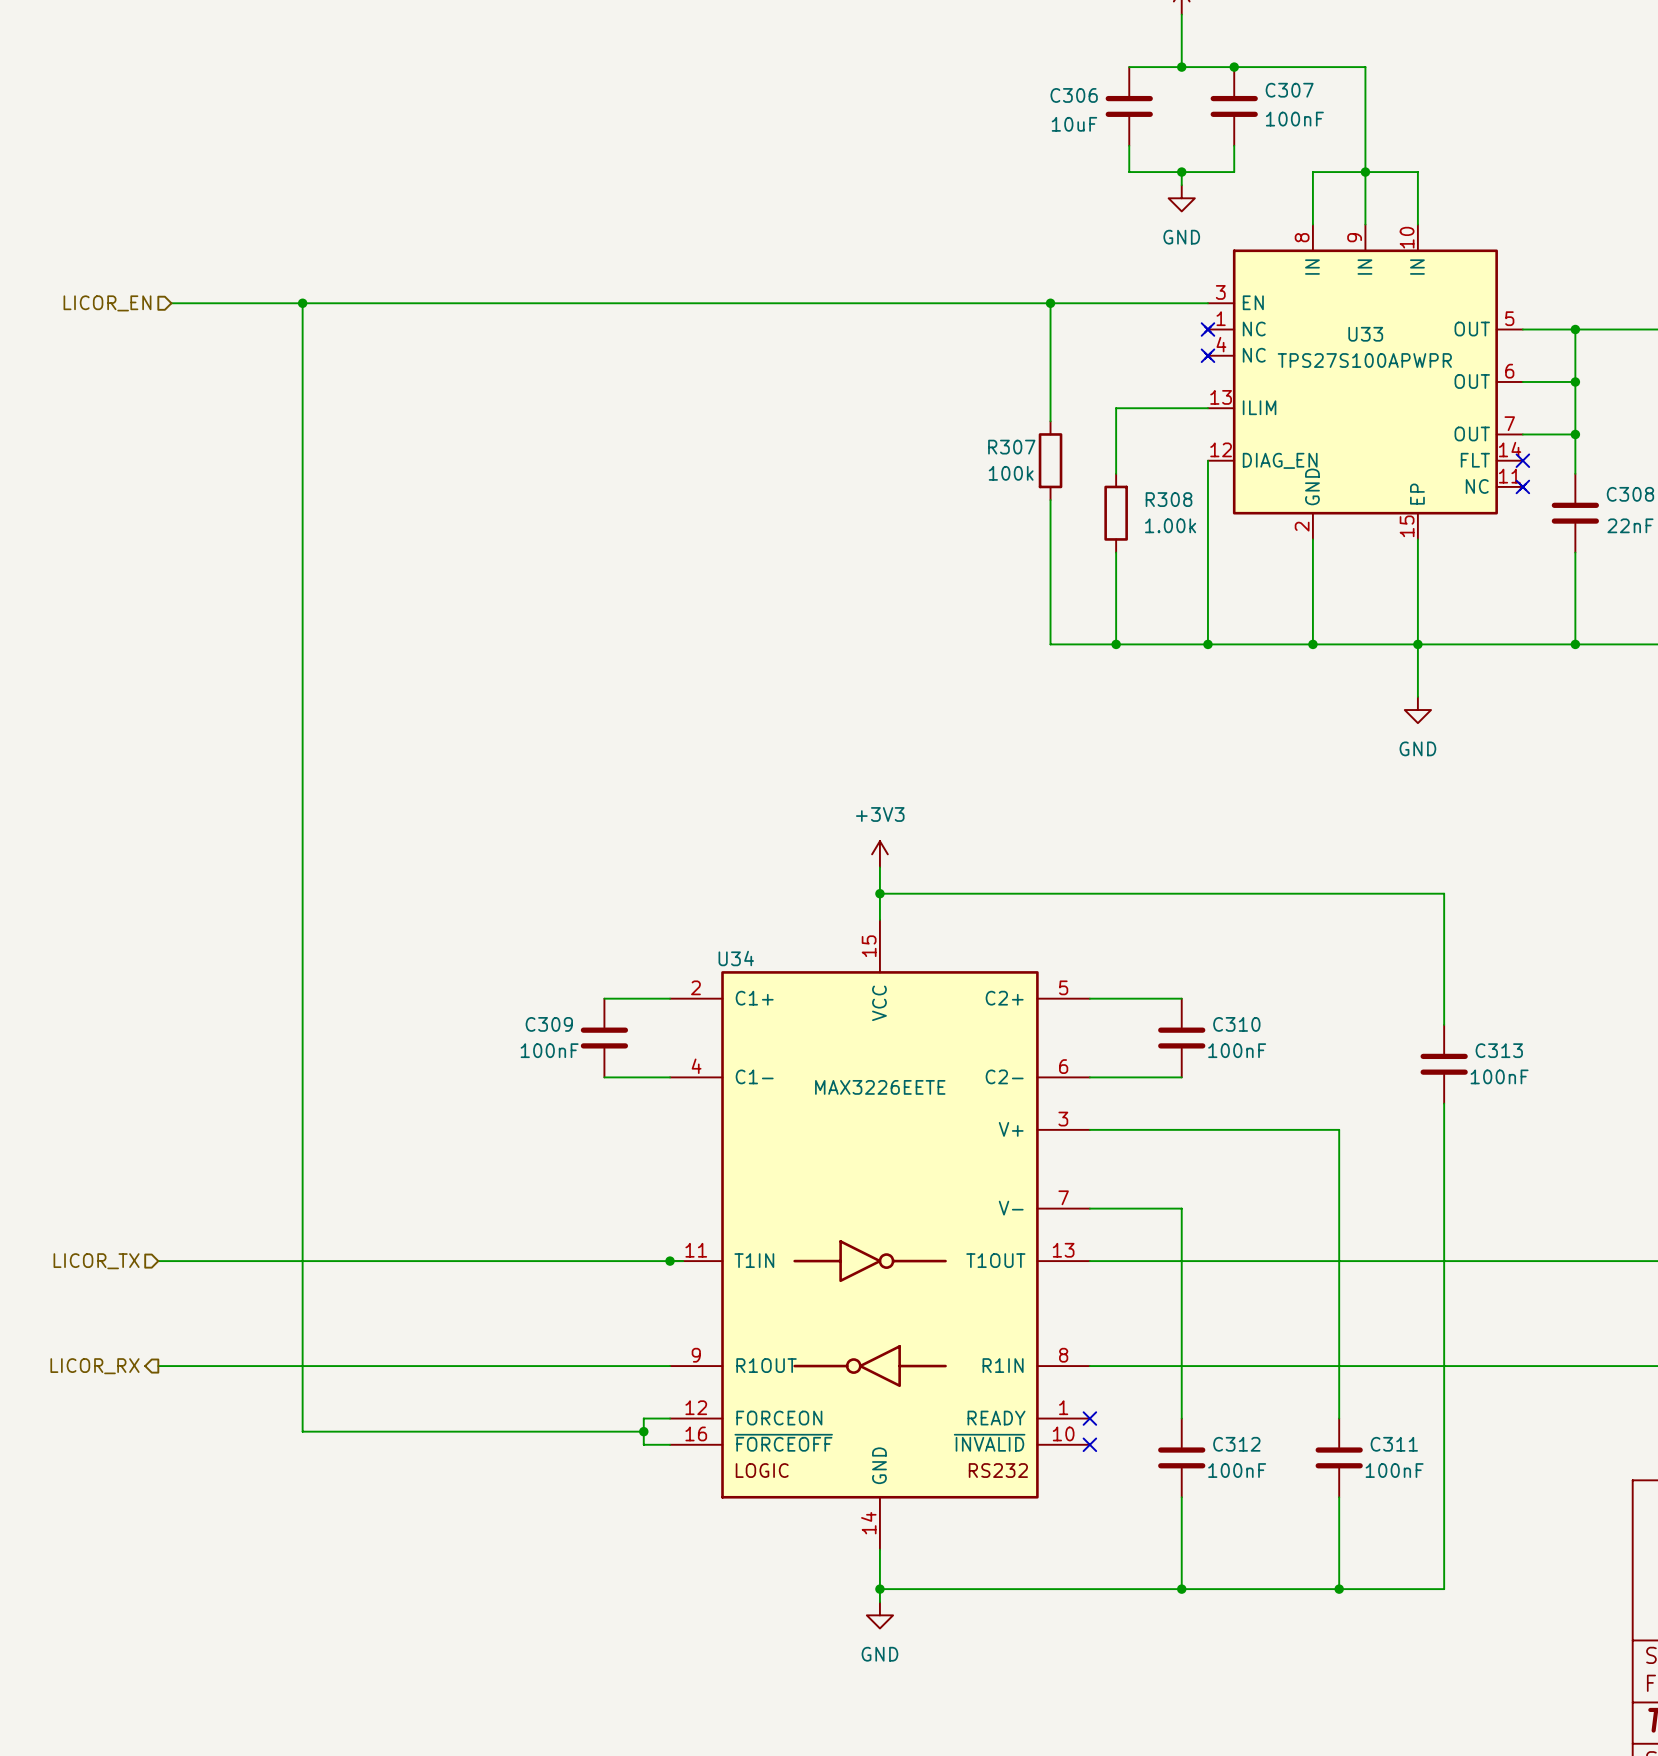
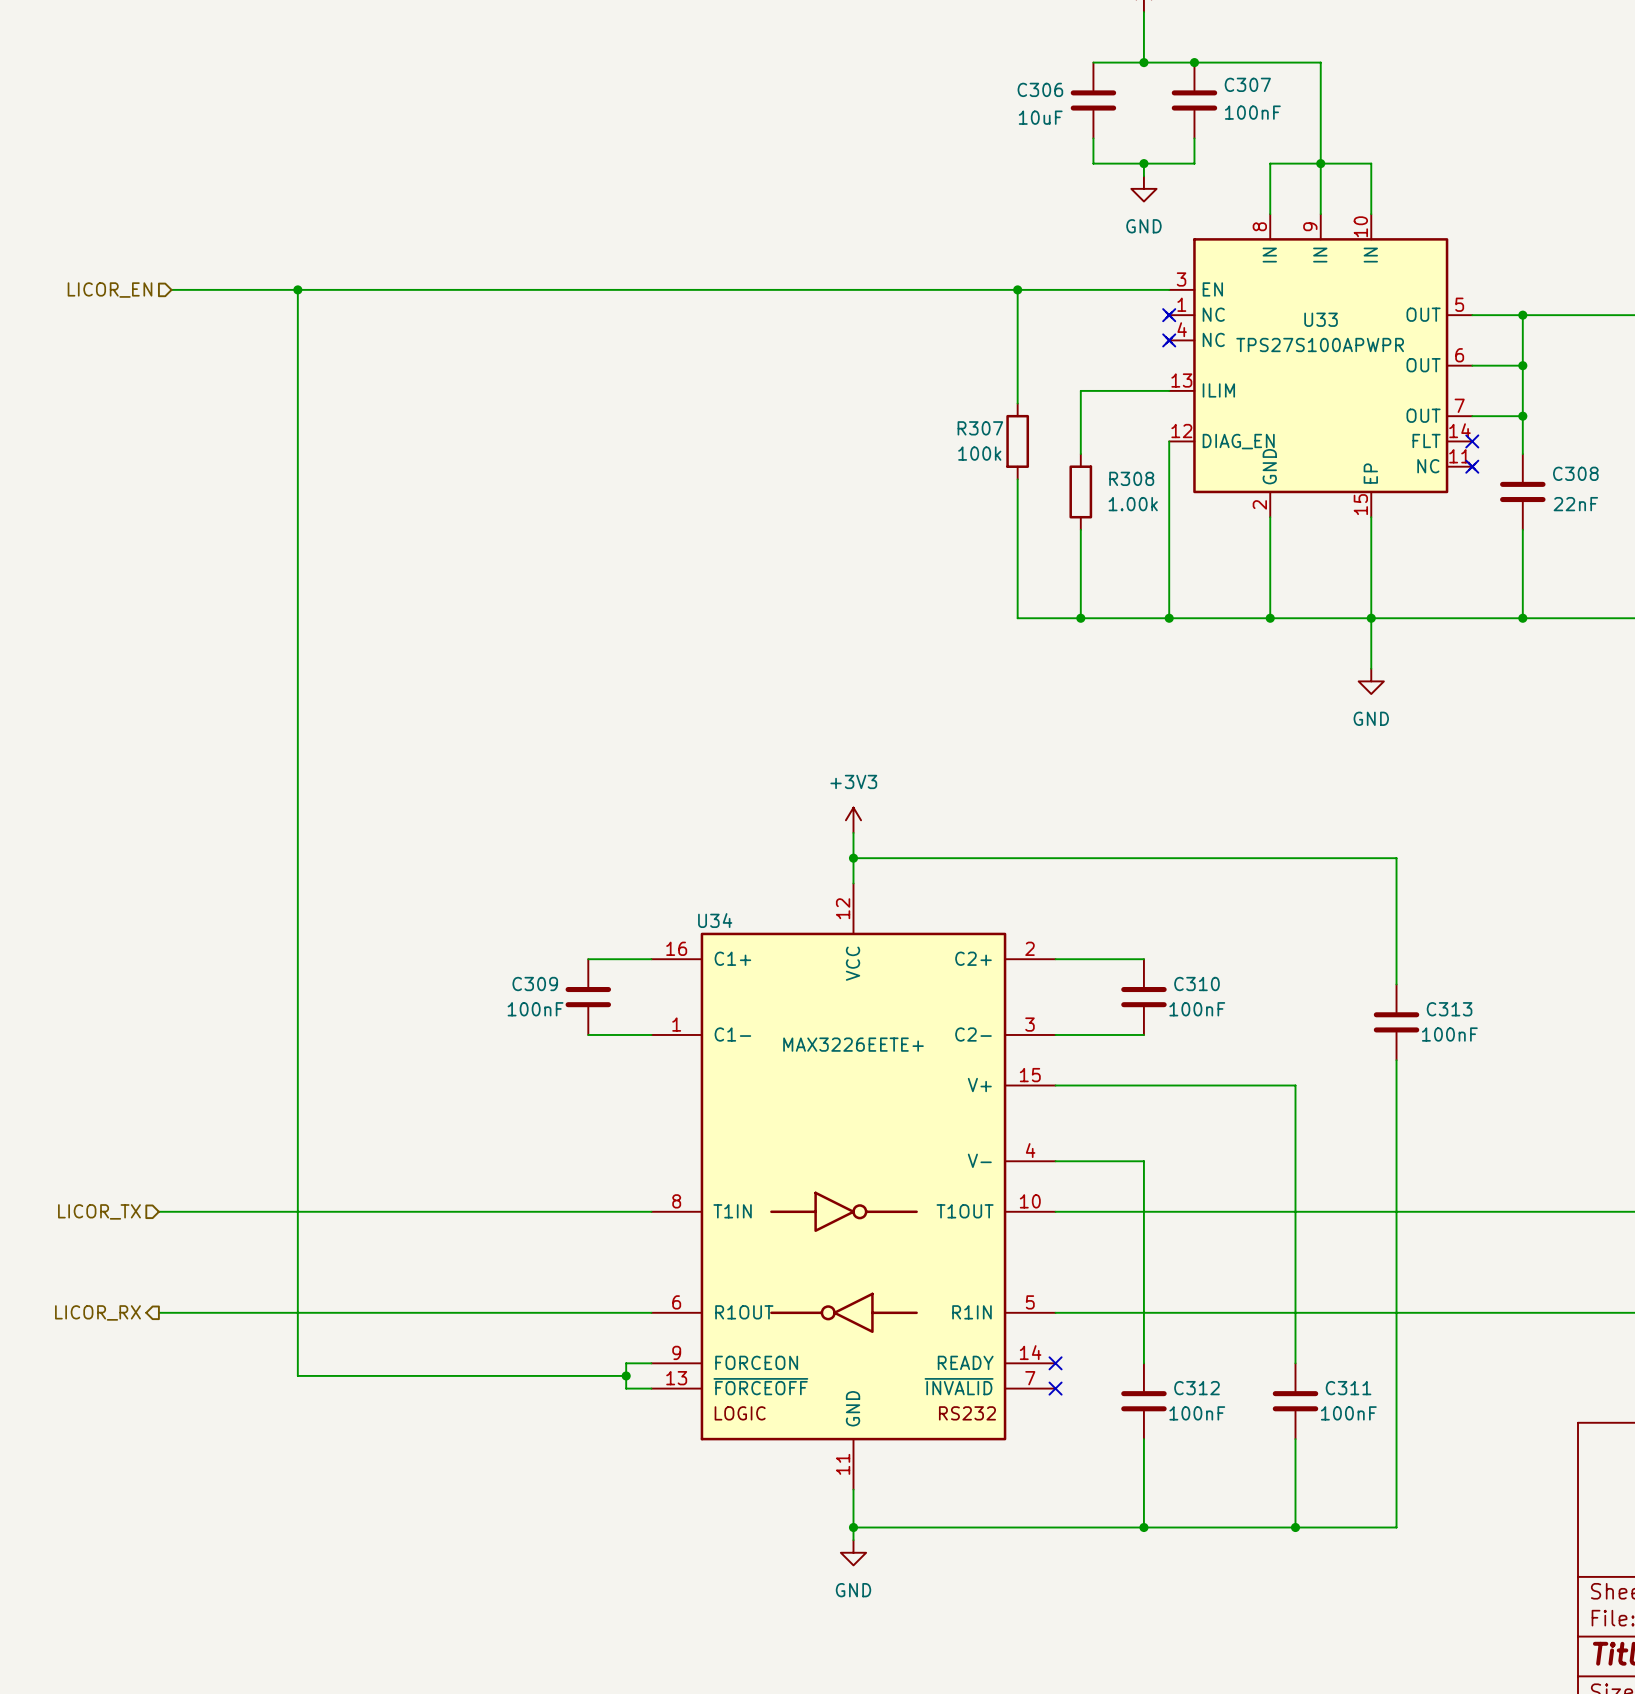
U34 symbol: [670, 919, 1090, 1550] -> [651, 883, 1056, 1490]
U34 value: MAX3226EETE (880, 1087) -> MAX3226EETE+ (853, 1044)
junction: (670, 1261) -> none

